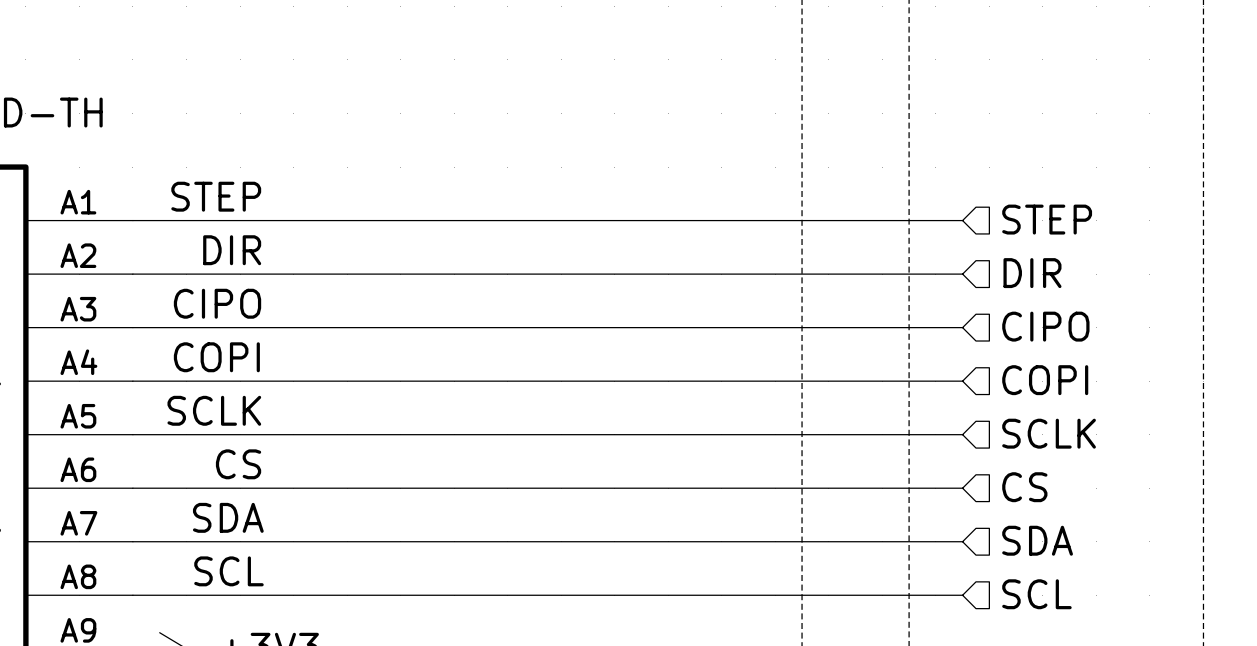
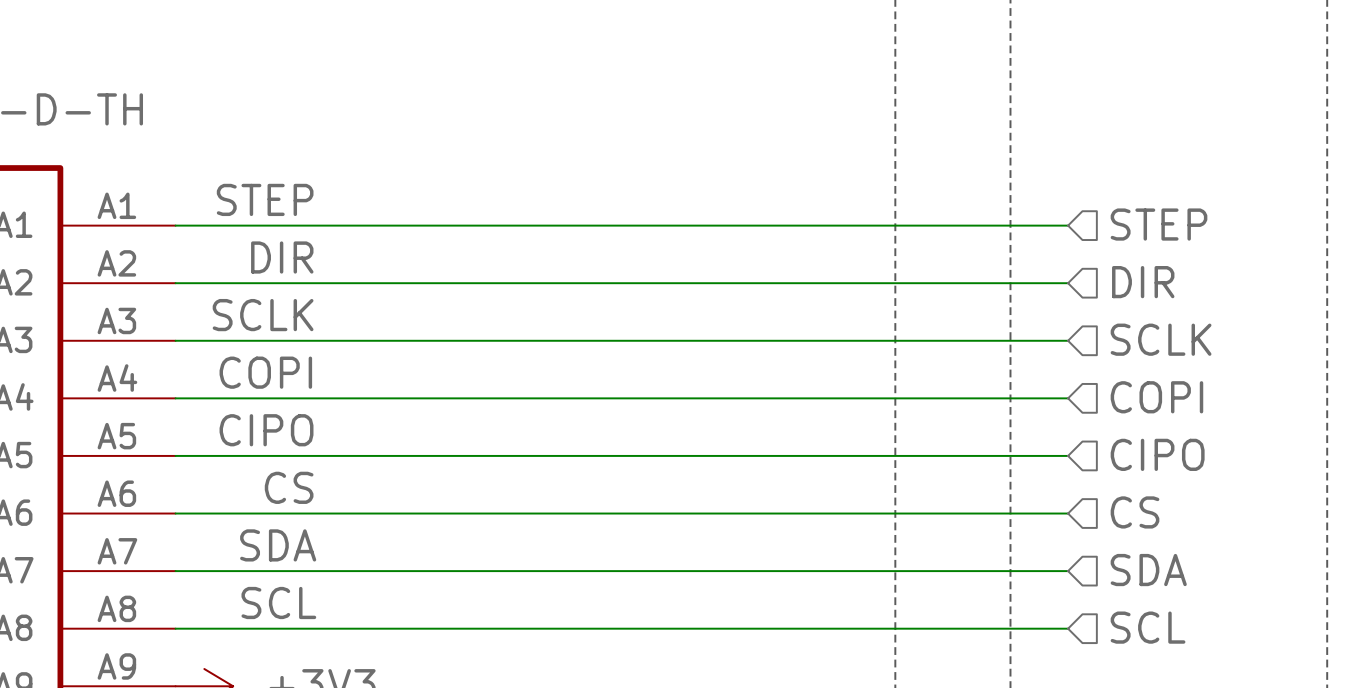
label: CIPO (217, 303) -> SCLK (263, 315)
hierarchical label: CIPO (1045, 326) -> SCLK (1161, 339)
label: SCLK (214, 410) -> CIPO (266, 430)
hierarchical label: SCLK (1049, 433) -> CIPO (1157, 454)

